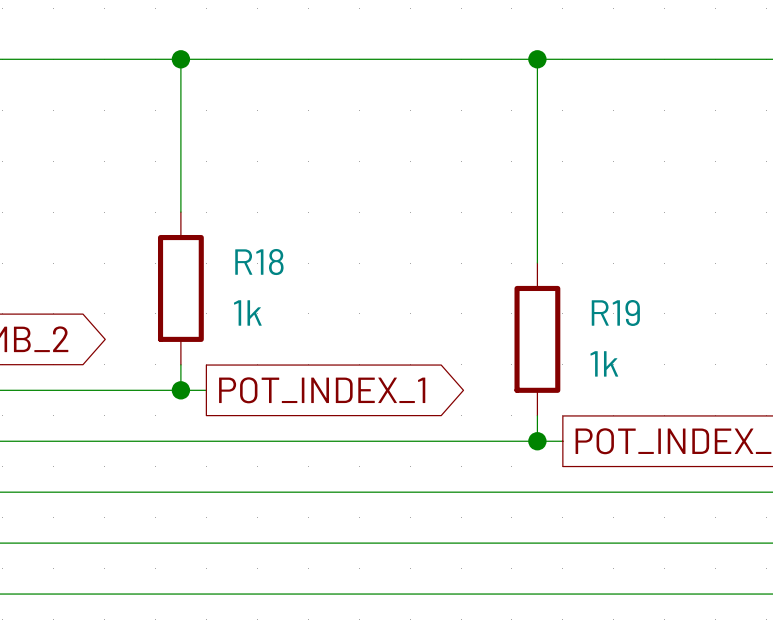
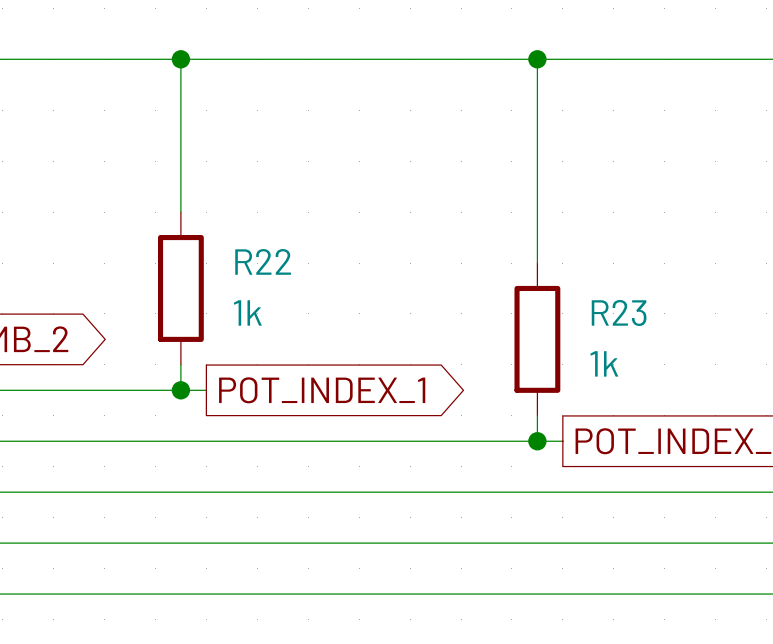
R18 name: R18 (259, 262) -> R22 (263, 261)
R19 name: R19 (615, 312) -> R23 (619, 312)

